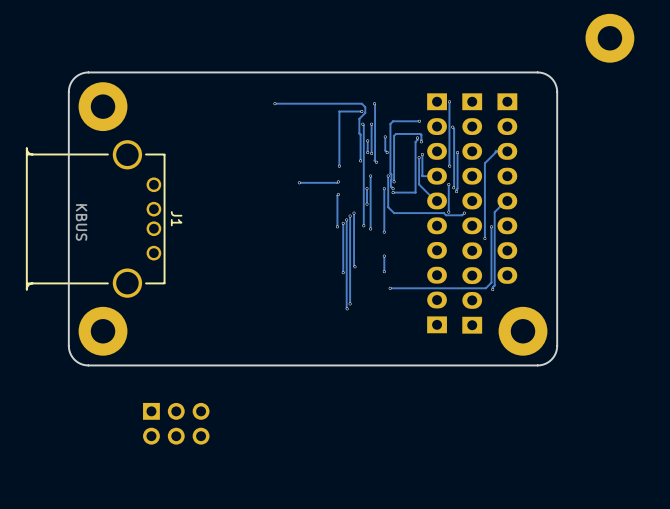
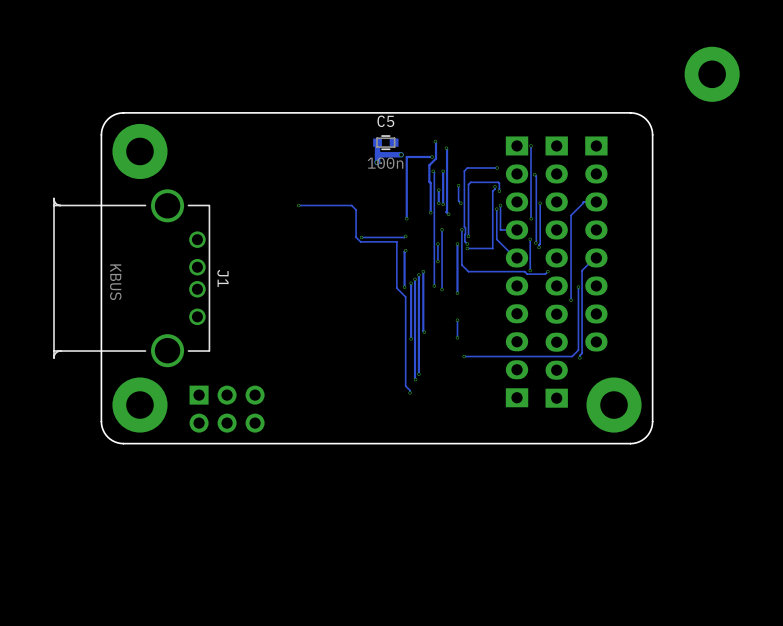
via: none -> (435, 141)
track: none -> (377, 142) (377, 162)
C5: none -> 100n (385, 142)
track: (274, 103) (361, 103) (365, 107) -> (435, 141) (436, 152)
via: (274, 103) -> none
track: none -> (401, 154) (377, 154)
via: none -> (401, 154)
via: none -> (377, 162)
track: none -> (298, 205) (351, 205) (356, 209) (356, 237) (360, 241) (396, 241) (396, 288) (405, 296) (405, 386) (410, 392)
via: none -> (298, 205)
via: none -> (410, 392)
part position: (176, 423) -> (227, 409)

